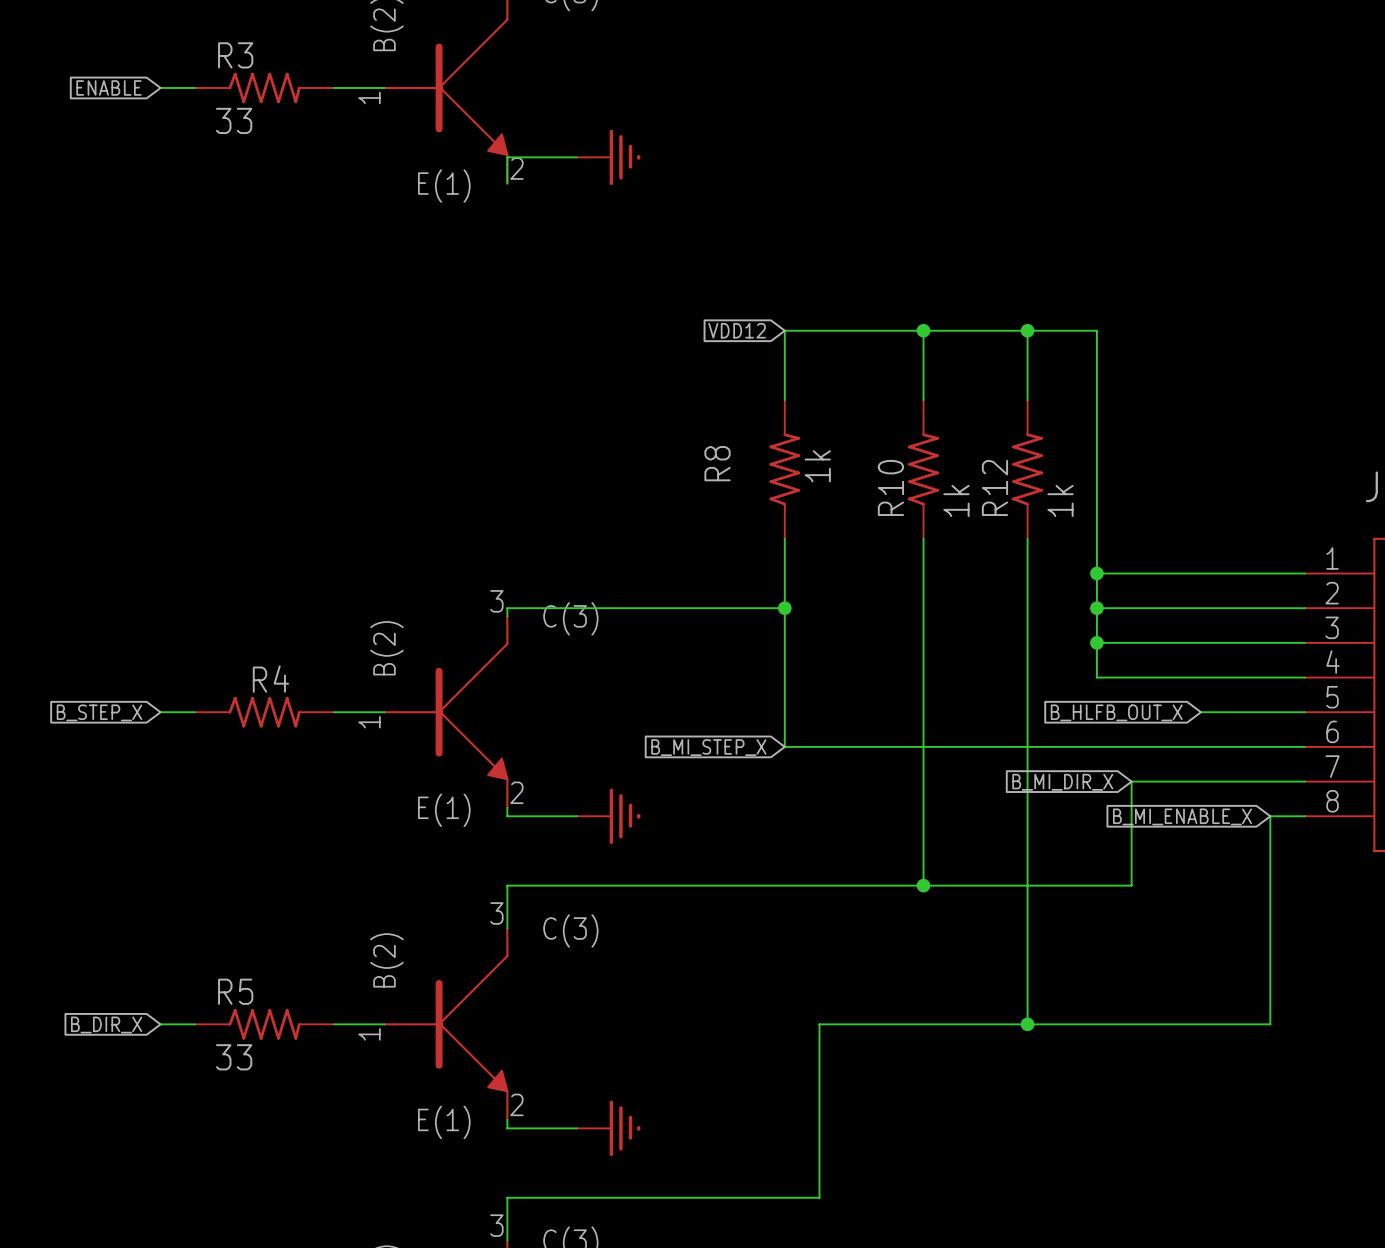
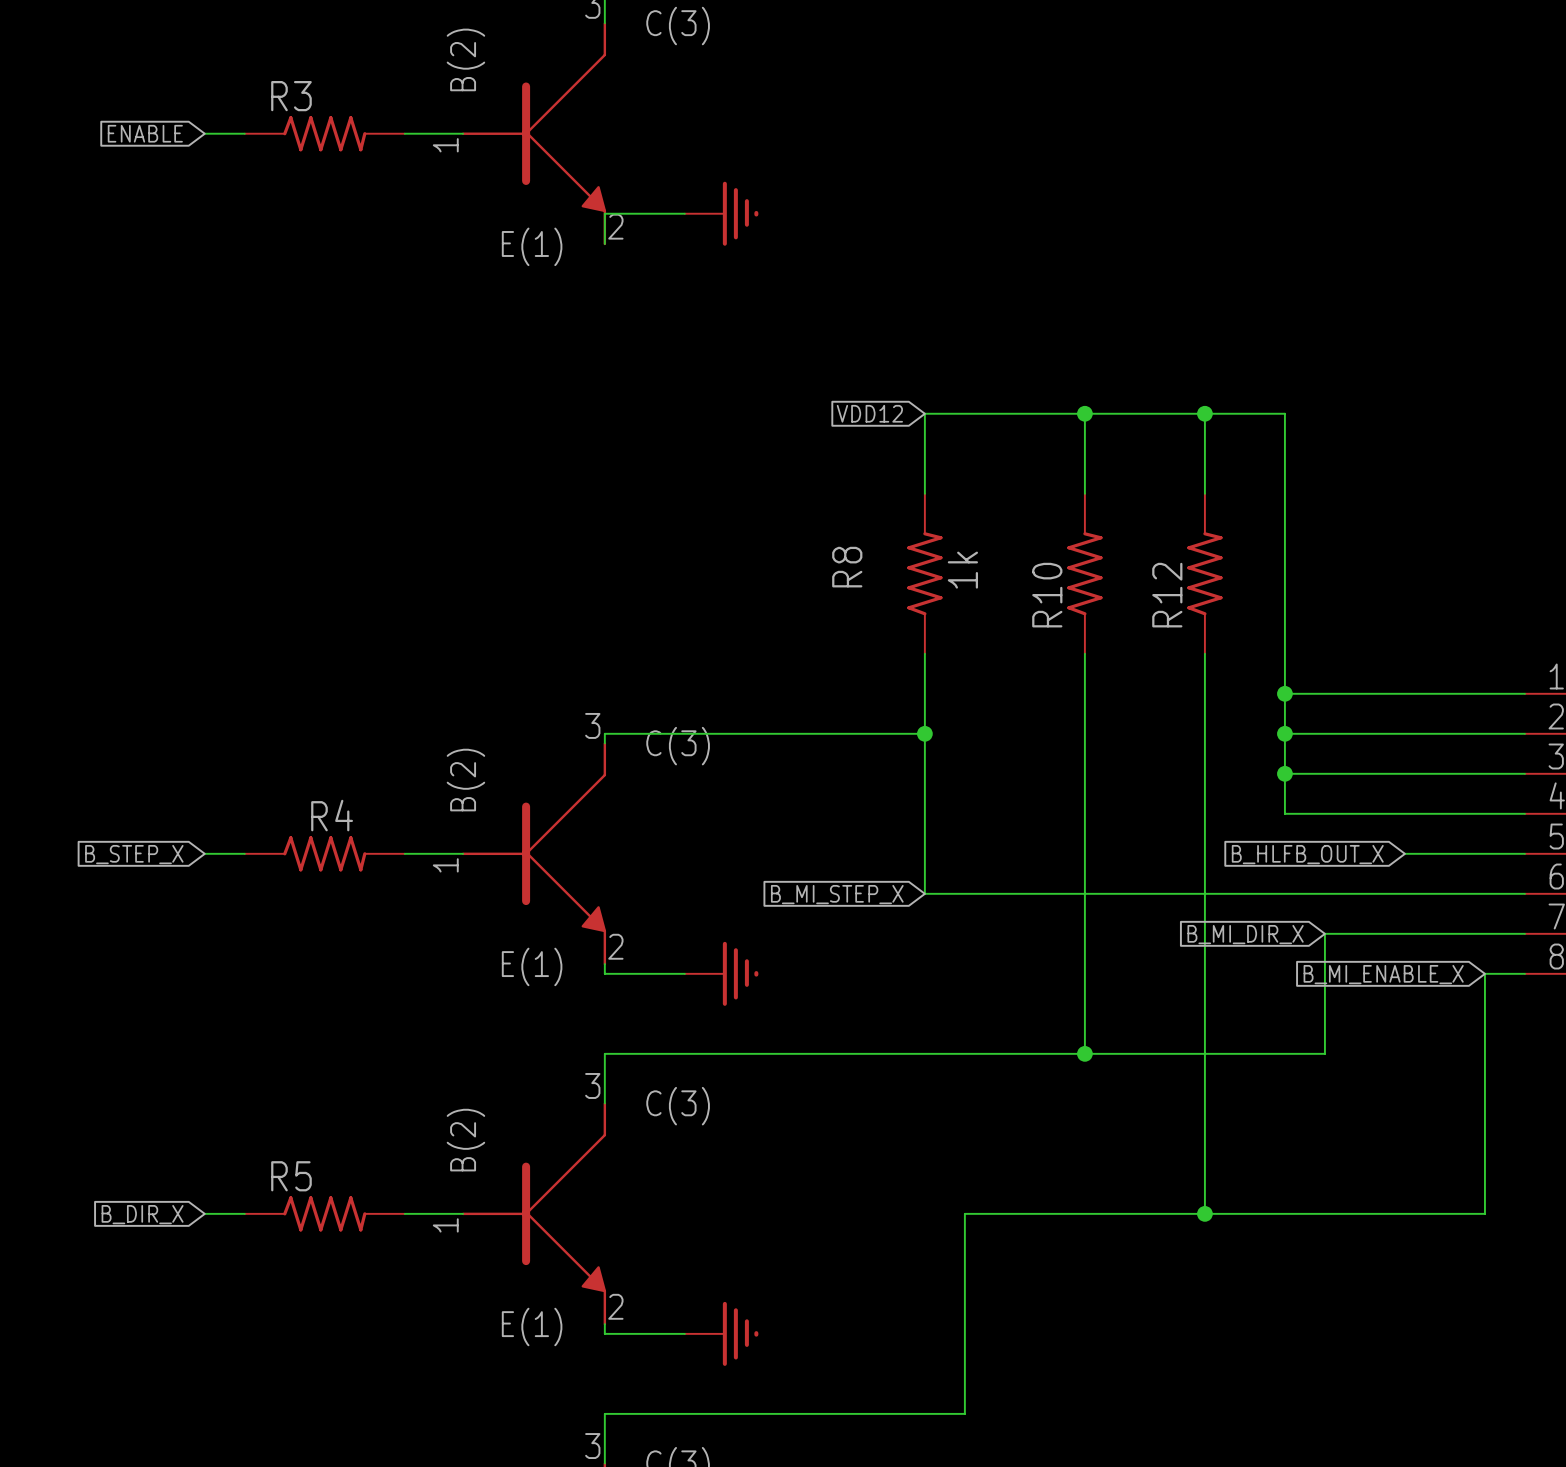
R3 value: 33 (234, 120) -> none
R10 value: 1k (956, 500) -> none
R12 value: 1k (1060, 500) -> none
R5 value: 33 (234, 1057) -> none

